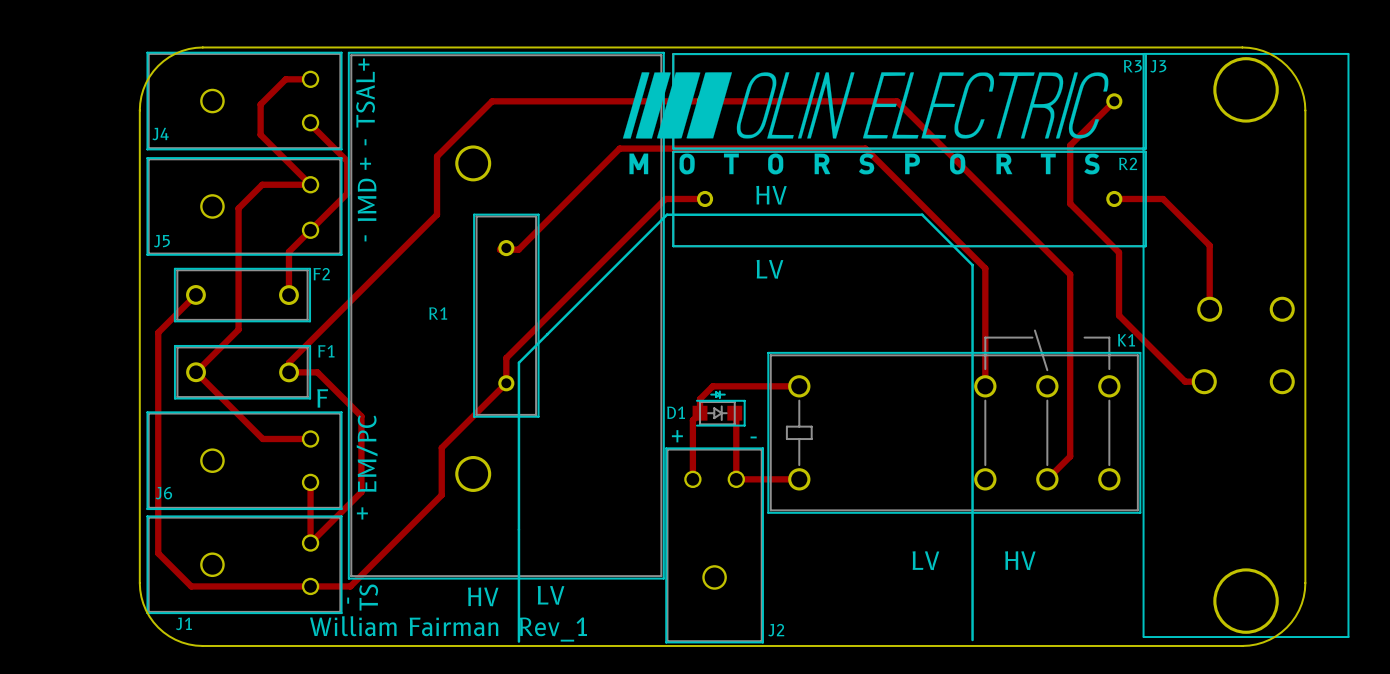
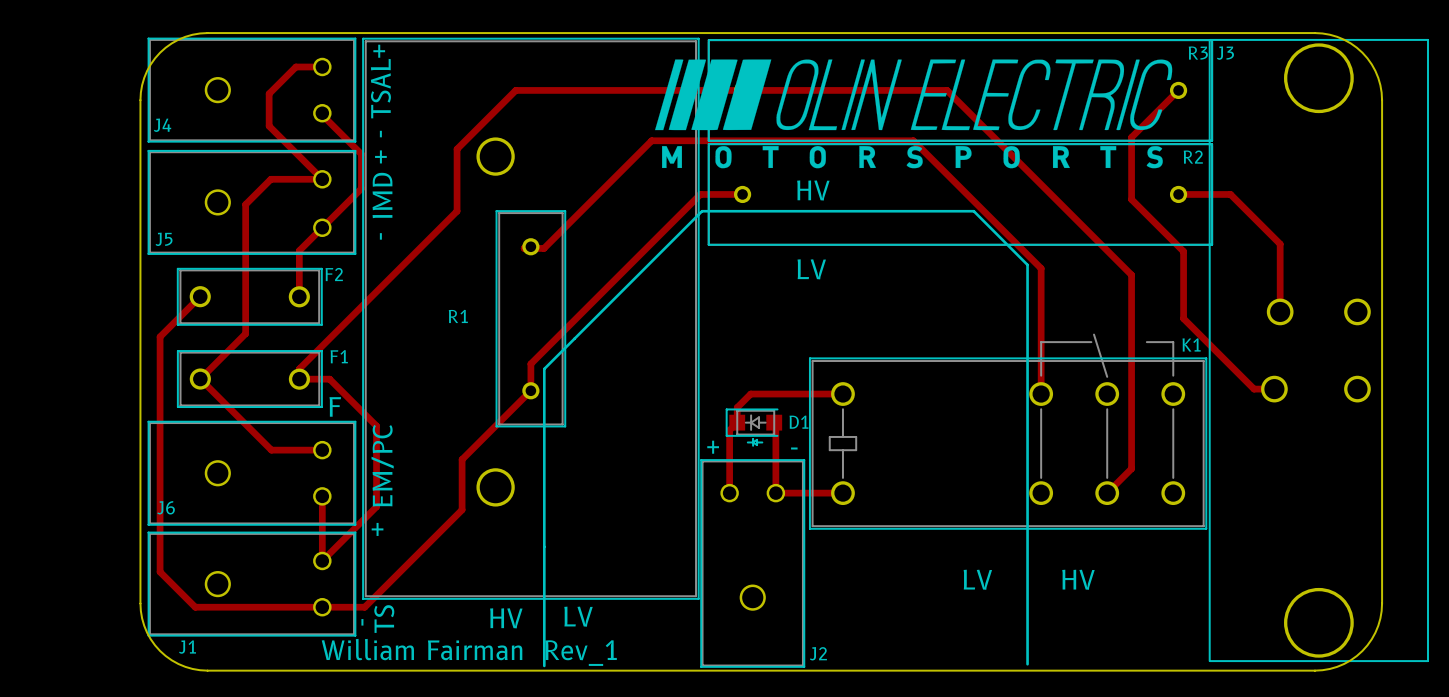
D1 rotation: 0° (719, 408) -> 180° (754, 427)

